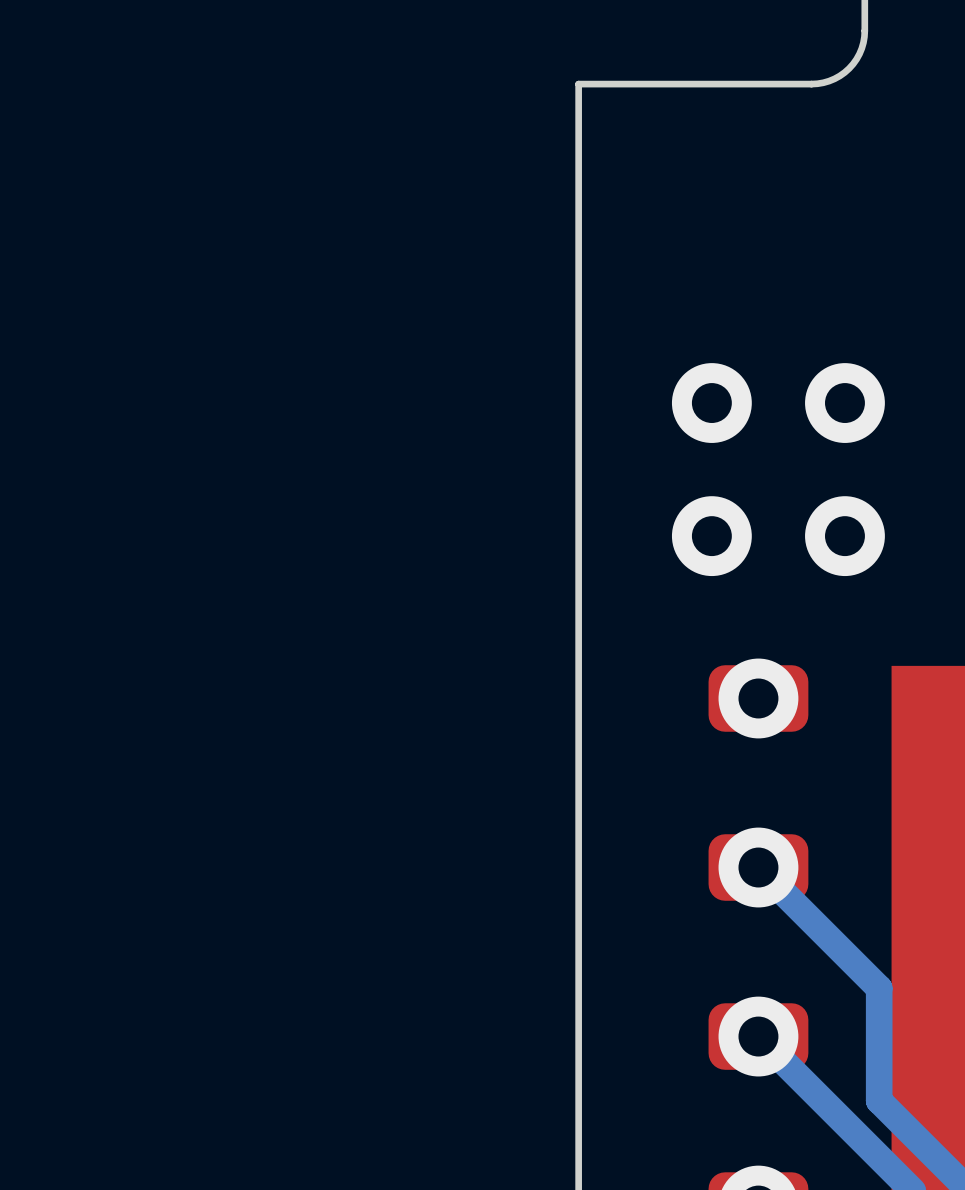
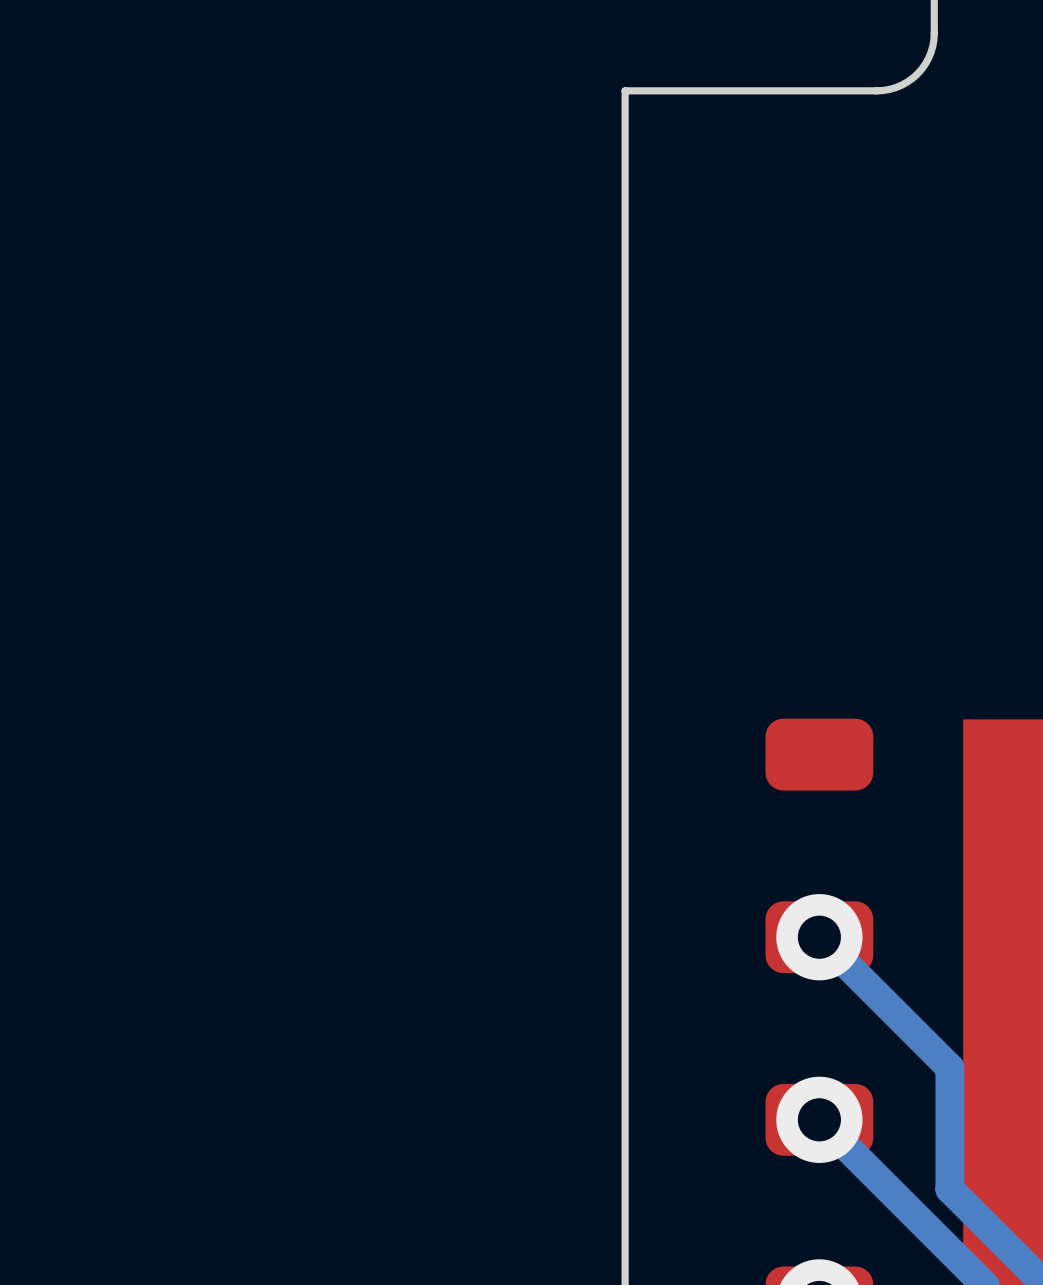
via: (711, 403) -> none
via: (844, 403) -> none
via: (711, 536) -> none
via: (844, 536) -> none
via: (758, 698) -> none

